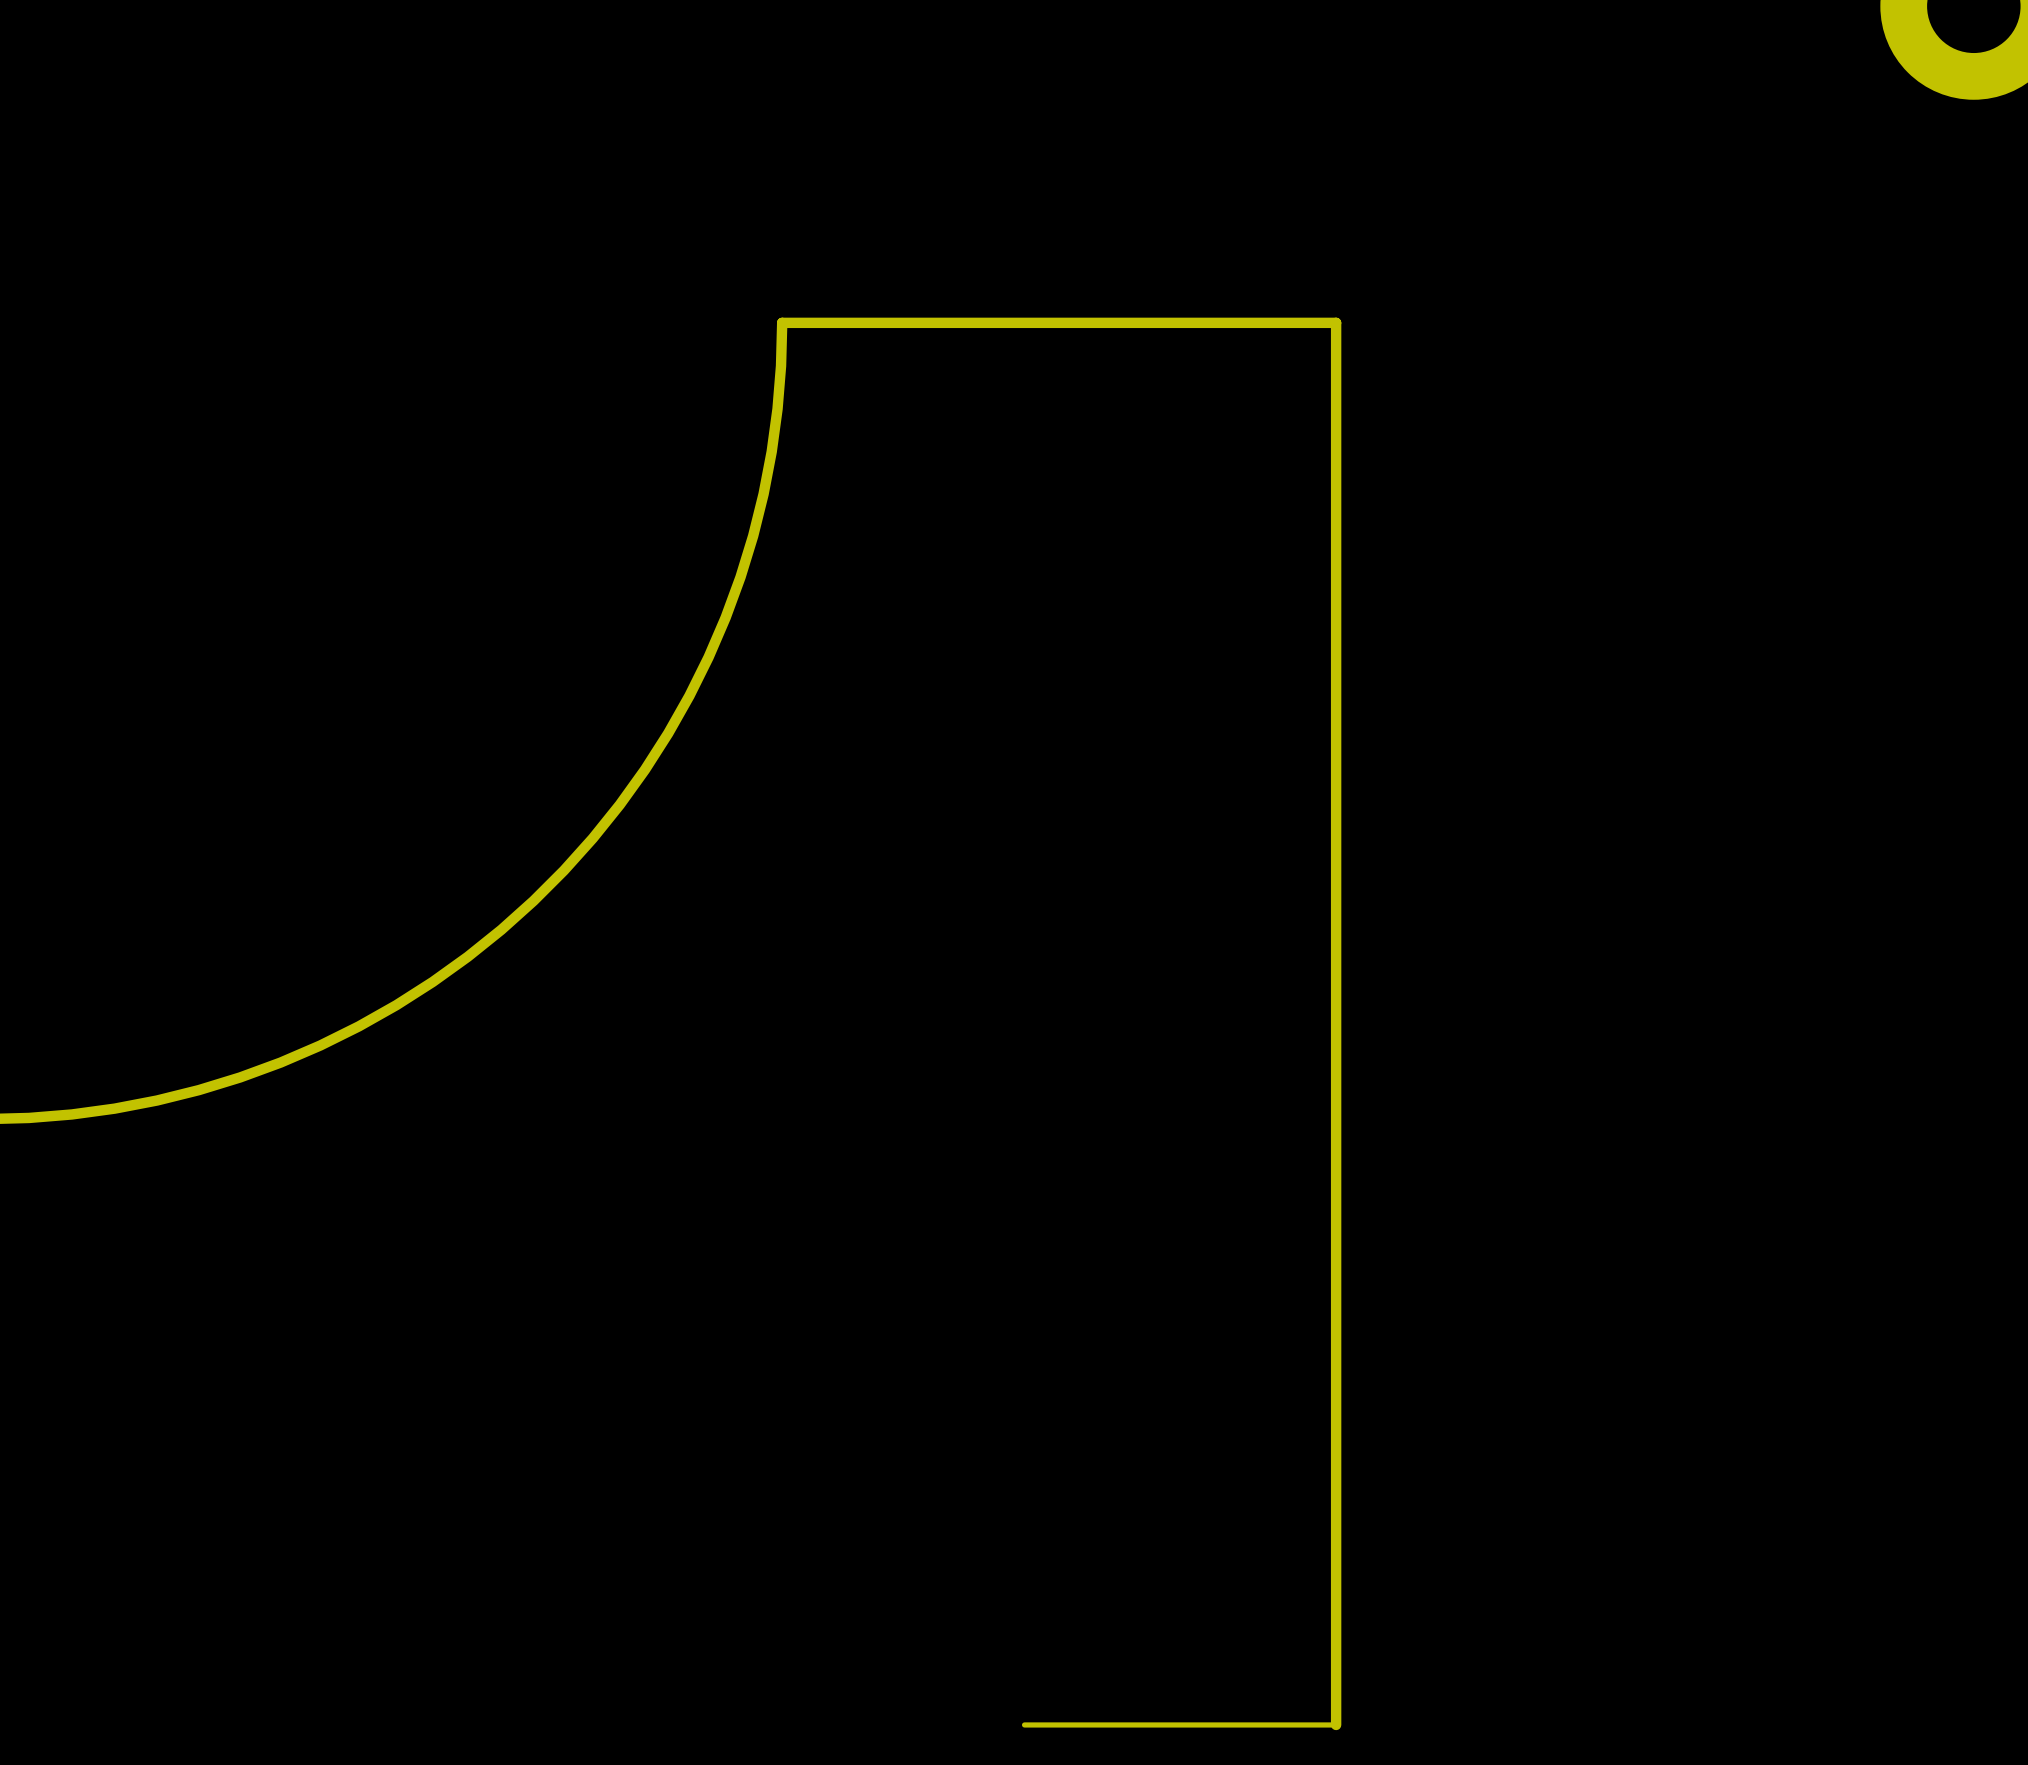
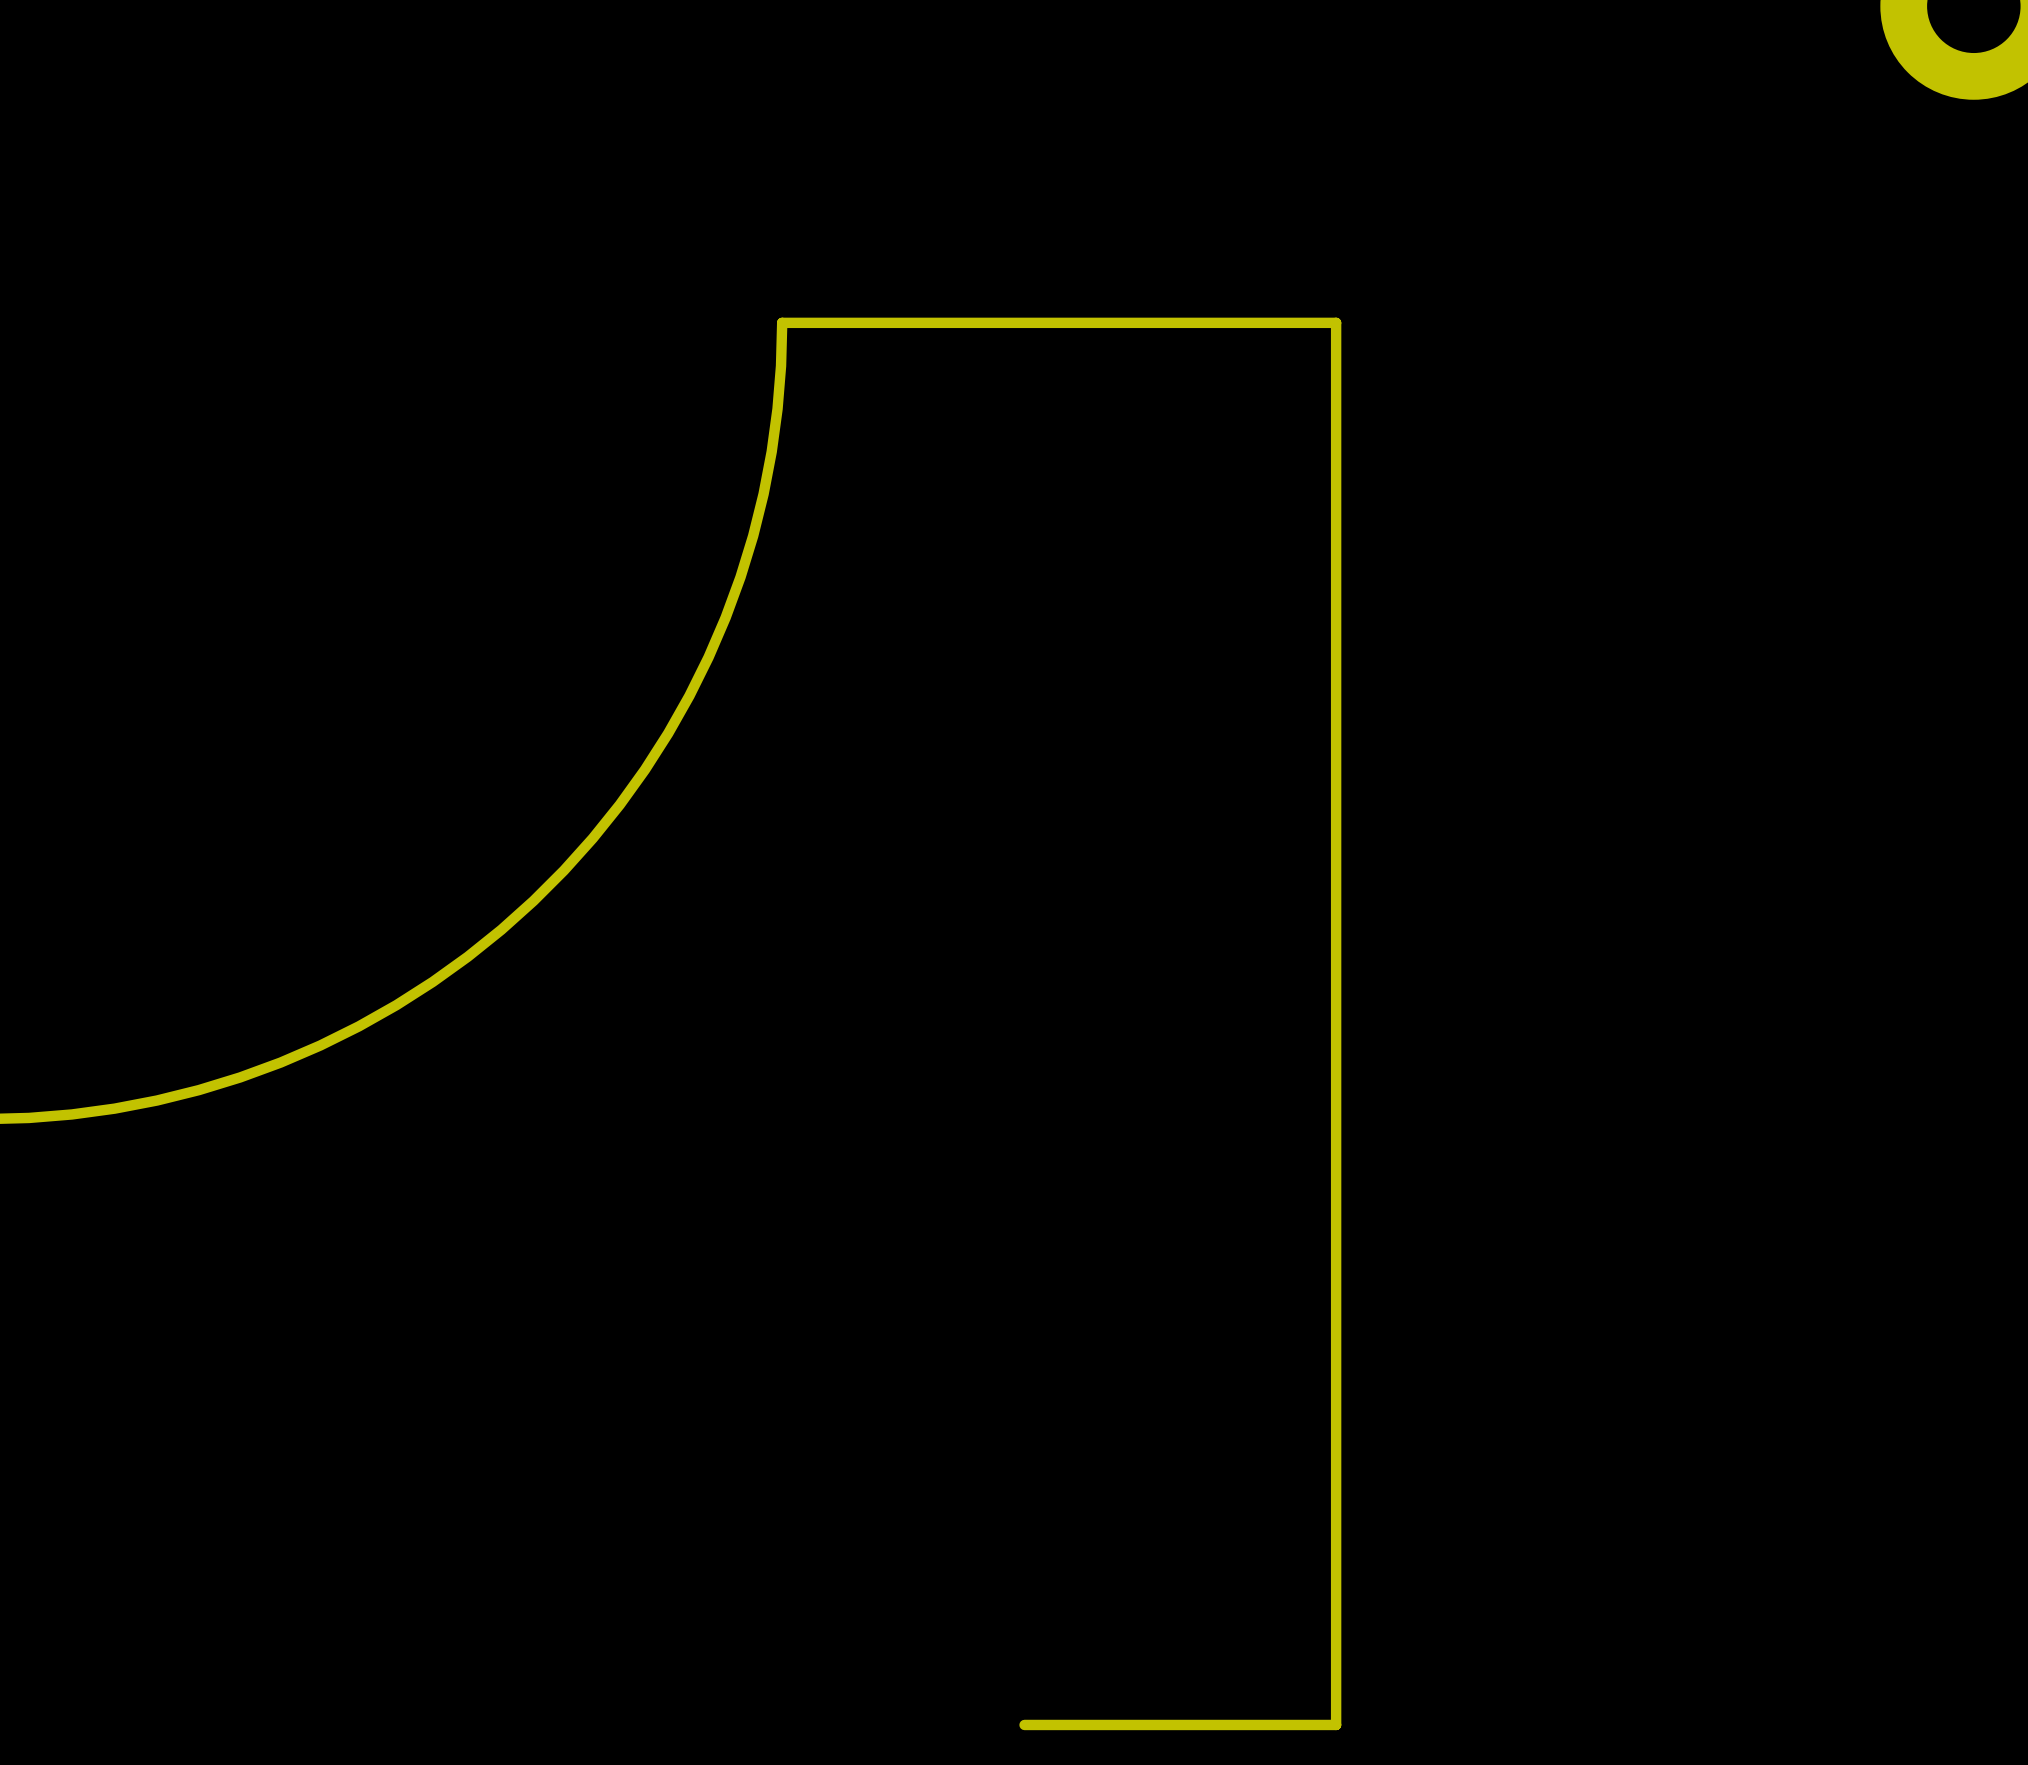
board edge width: thin (1336, 1724) (1024, 1724) -> thick (1336, 1724) (1024, 1724)

